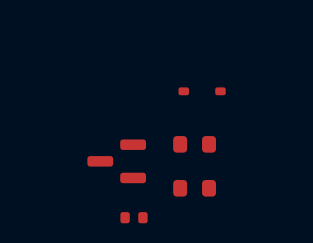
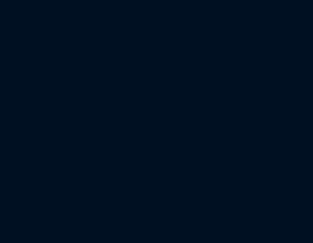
part: (202, 91) -> none
part: (194, 144) -> none
part: (116, 161) -> none
part: (194, 188) -> none
part: (134, 217) -> none

